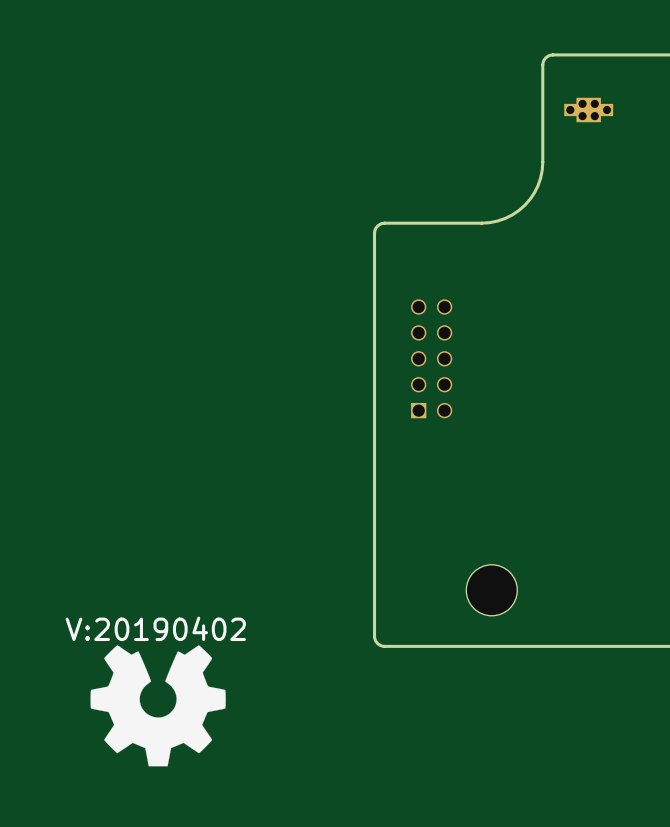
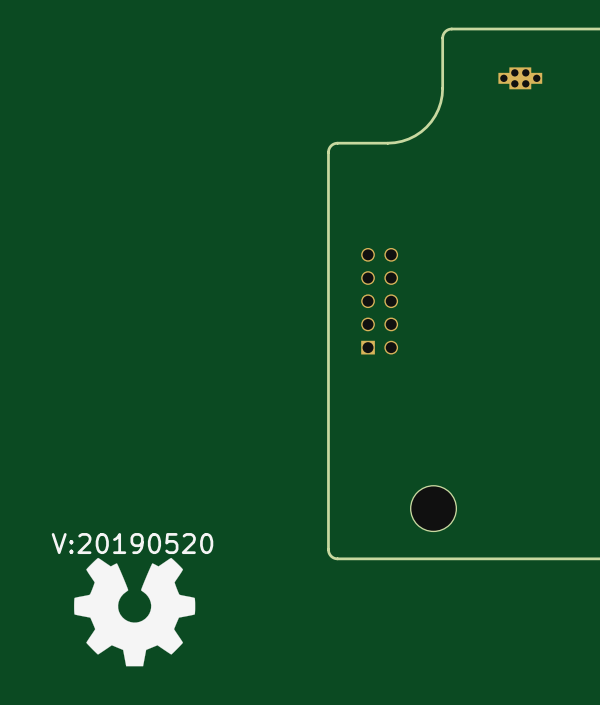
board edge: (552, 54) (546, 57) (542, 63) (542, 169) (538, 185) (524, 205) (512, 214) (489, 222) (383, 223) (377, 226) (374, 233) -> (488, 29) (451, 29) (445, 31) (442, 38) (442, 95) (438, 109) (431, 121) (415, 135) (402, 141) (333, 144) (328, 151) (328, 188)
drawing shape: [65, 616, 246, 642] -> [51, 533, 214, 555]

